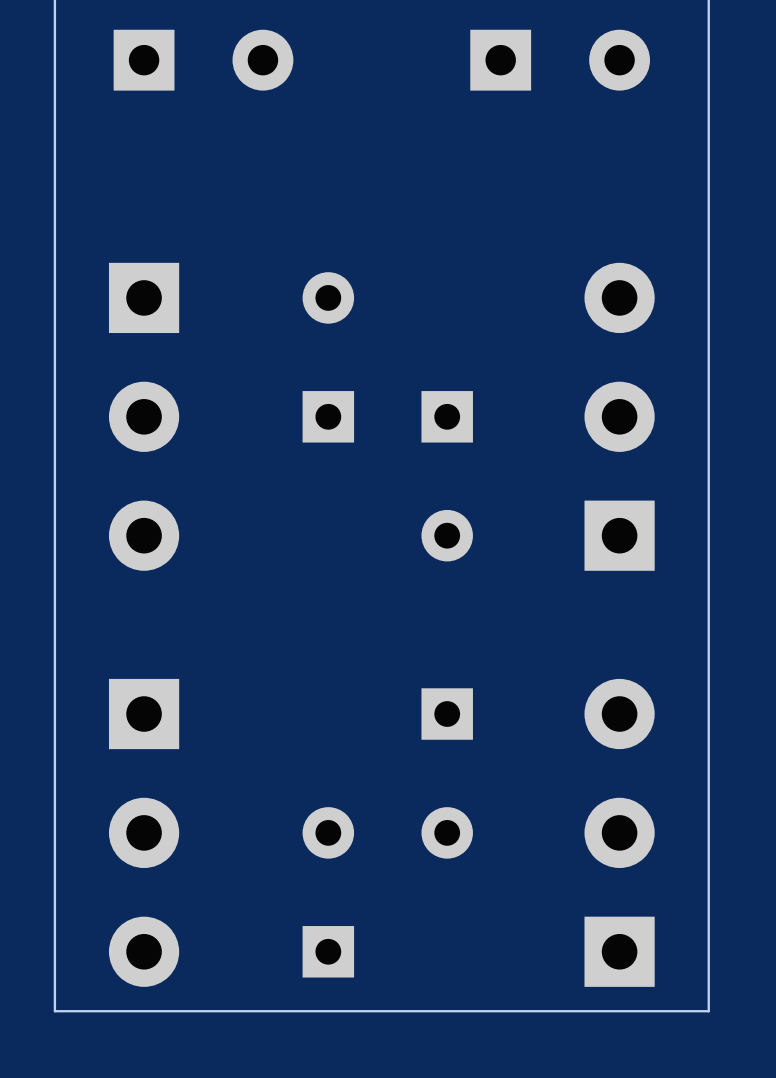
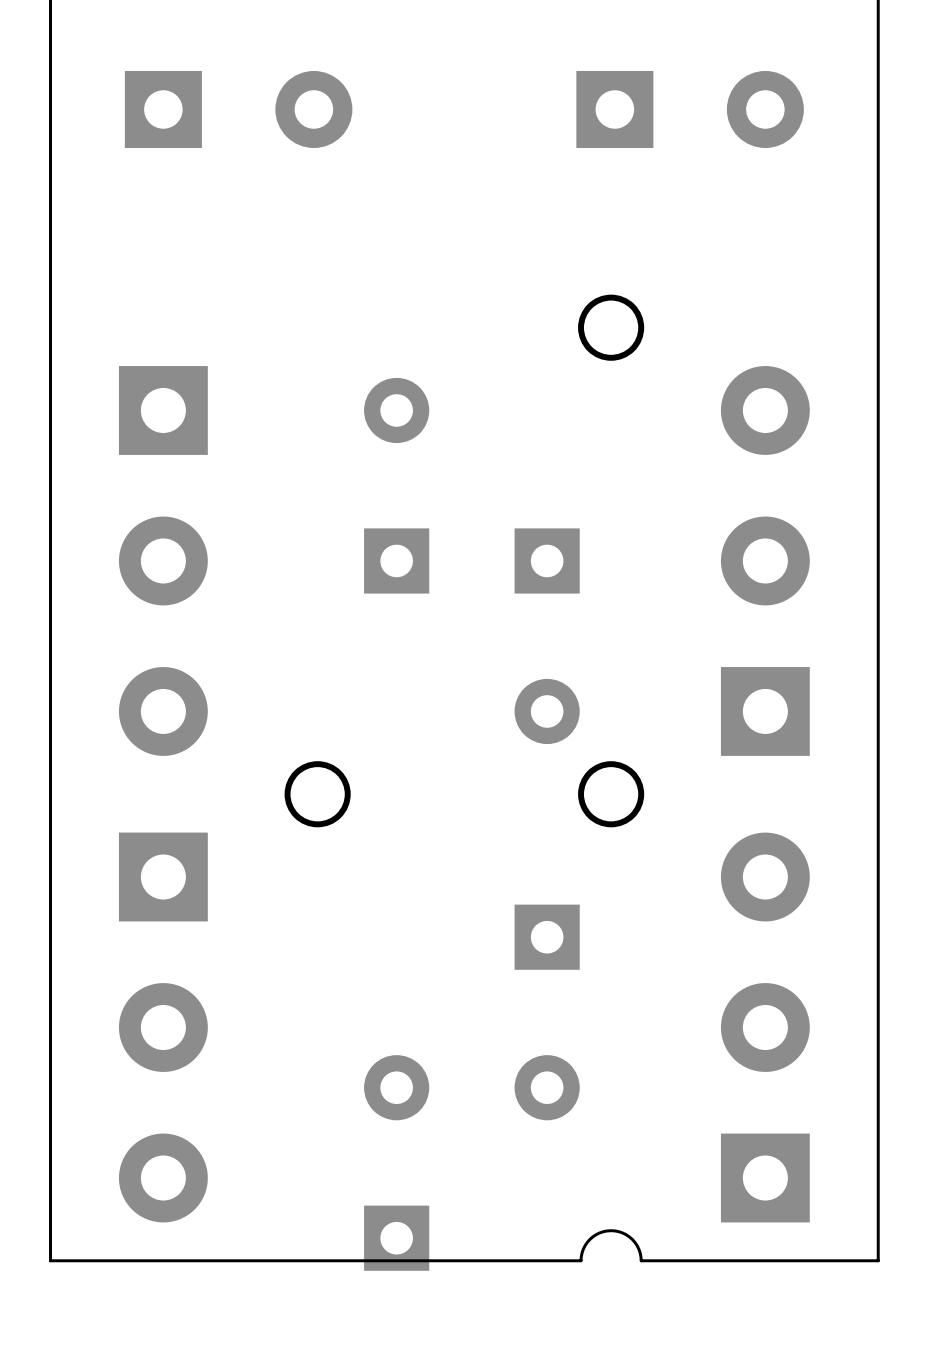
round board edge: none -> [578, 294, 645, 361]
round board edge: none -> [284, 761, 351, 828]
round board edge: none -> [578, 761, 645, 828]
part position: (144, 832) -> (163, 1027)
part position: (619, 832) -> (765, 1027)
board edge: (708, 969) (708, 1011) (54, 1011) (54, 969) -> (878, 1260) (641, 1260) (638, 1249) (632, 1239) (622, 1232) (611, 1230) (599, 1232) (589, 1239) (583, 1249) (581, 1260) (50, 1260)

